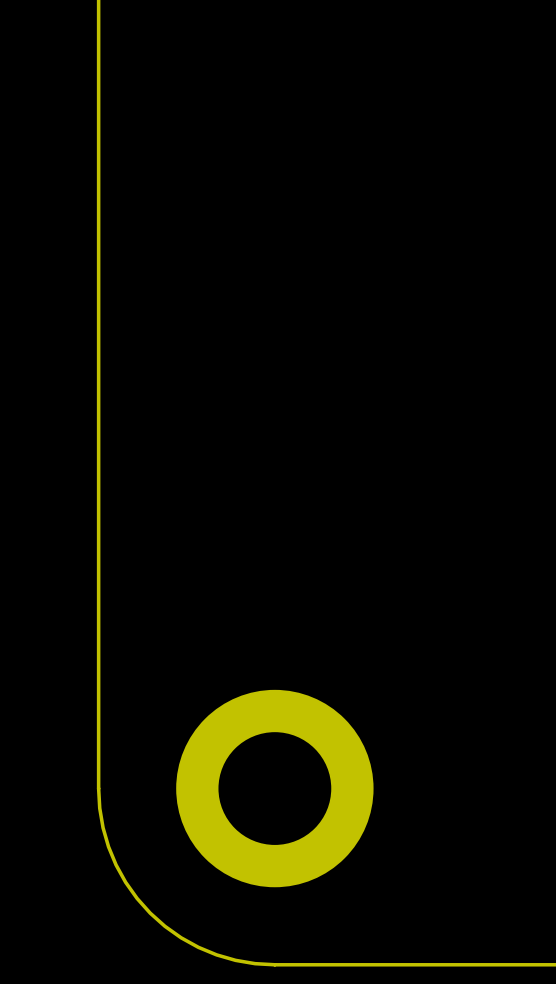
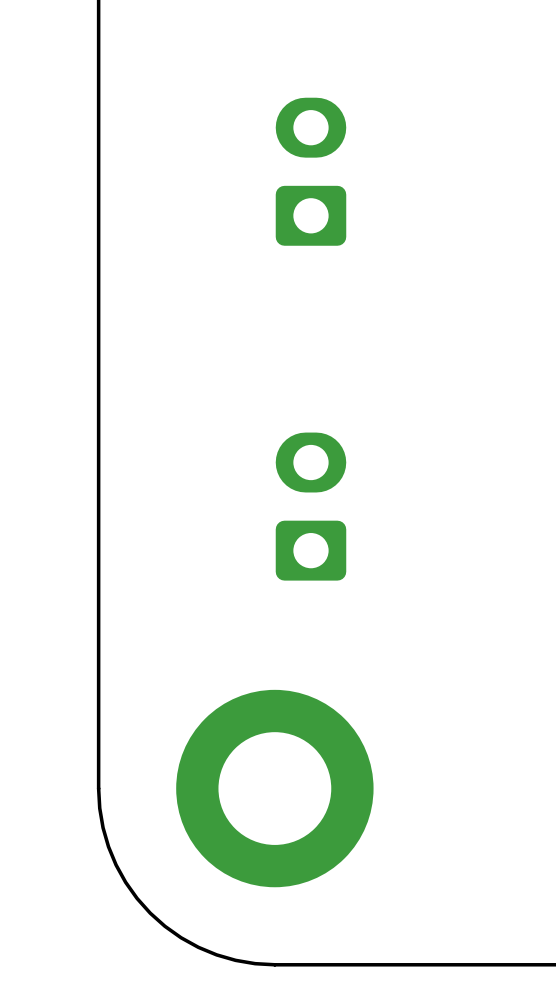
part: none -> (310, 171)
part: none -> (310, 506)

